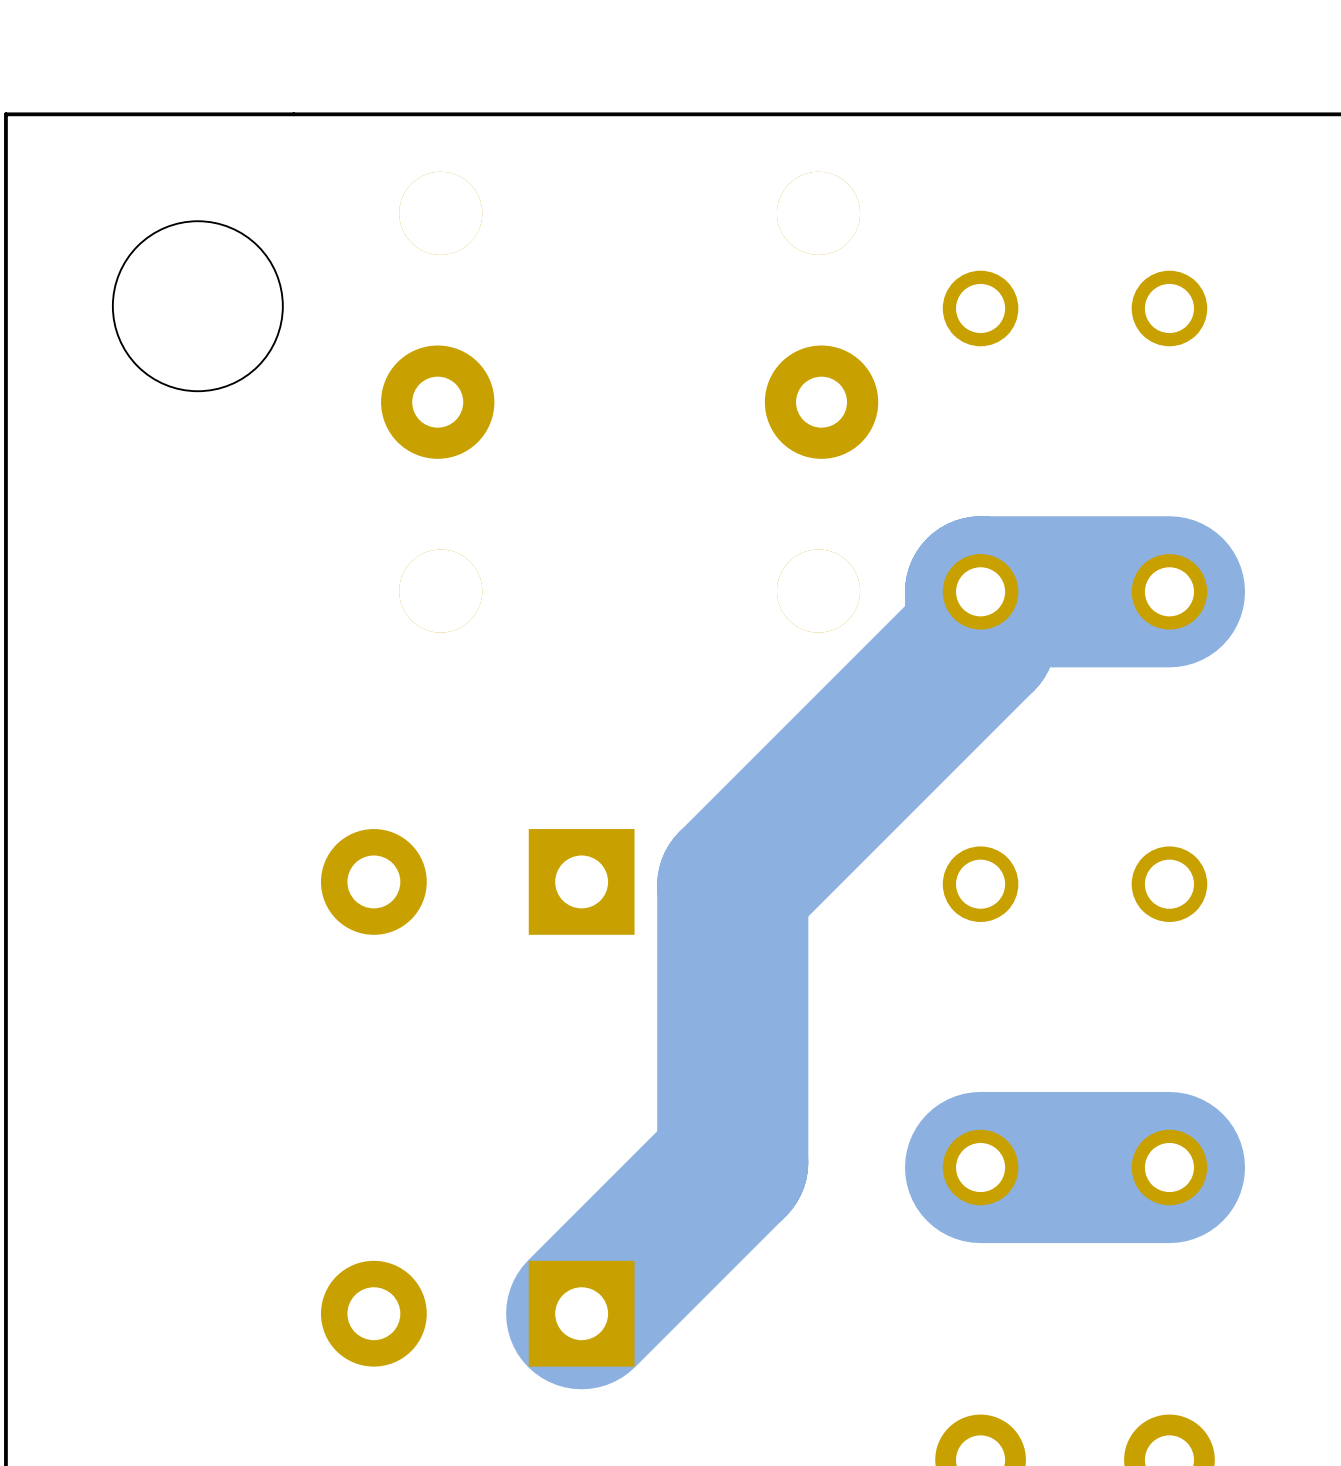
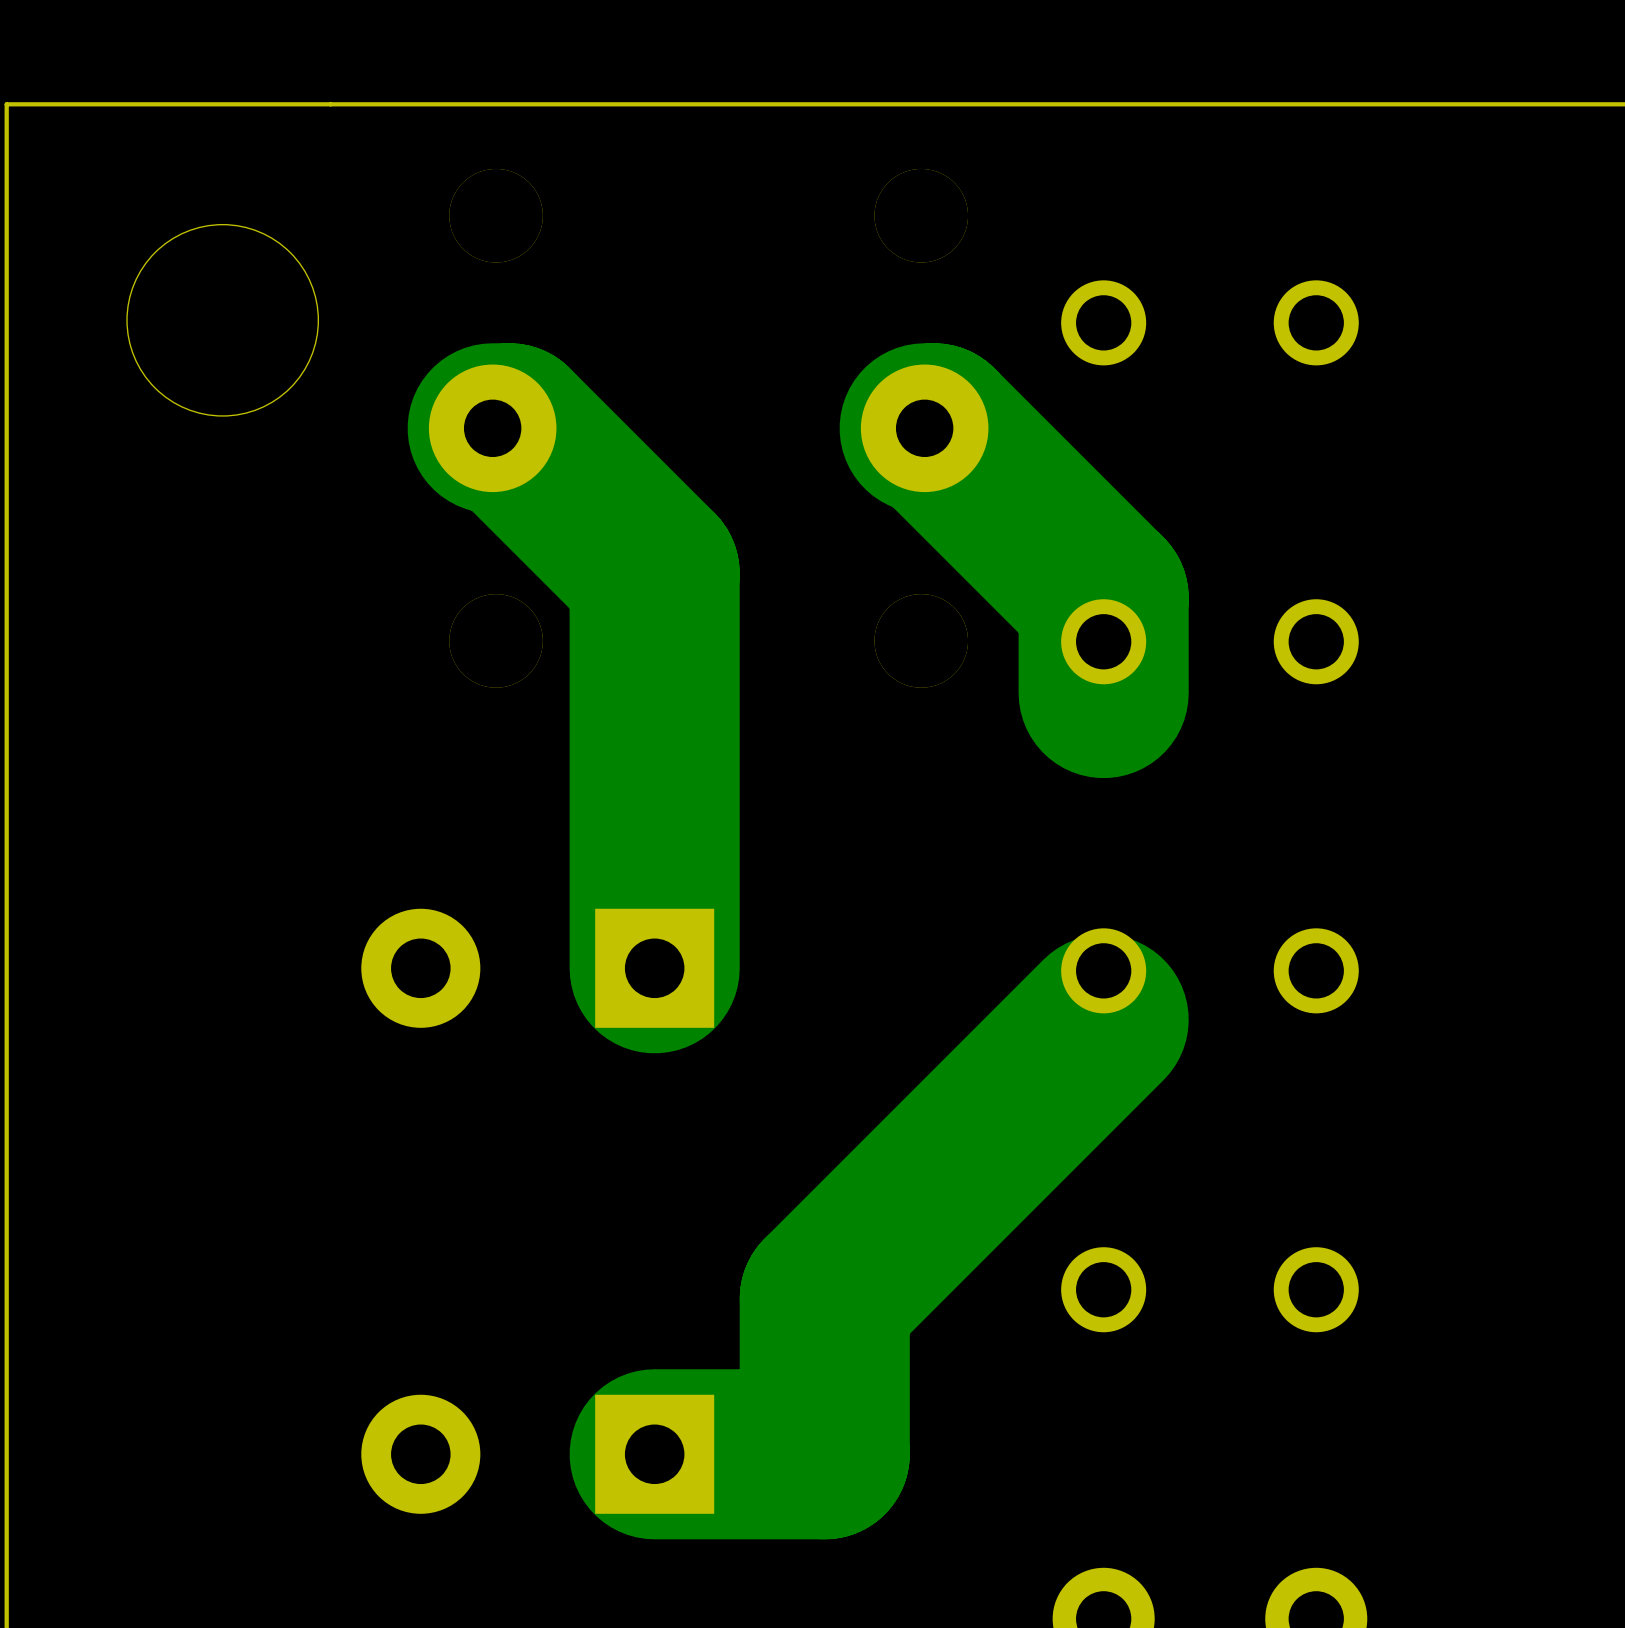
track: none -> (492, 428) (509, 428) (654, 573) (654, 968)
track: (1169, 591) (980, 591) -> (924, 428) (934, 428) (1103, 597) (1103, 641)
track: (980, 637) (732, 885) (732, 1162) (581, 1313) -> (1103, 1019) (824, 1298) (824, 1454) (654, 1454)
track: (1169, 1167) (980, 1167) -> none

